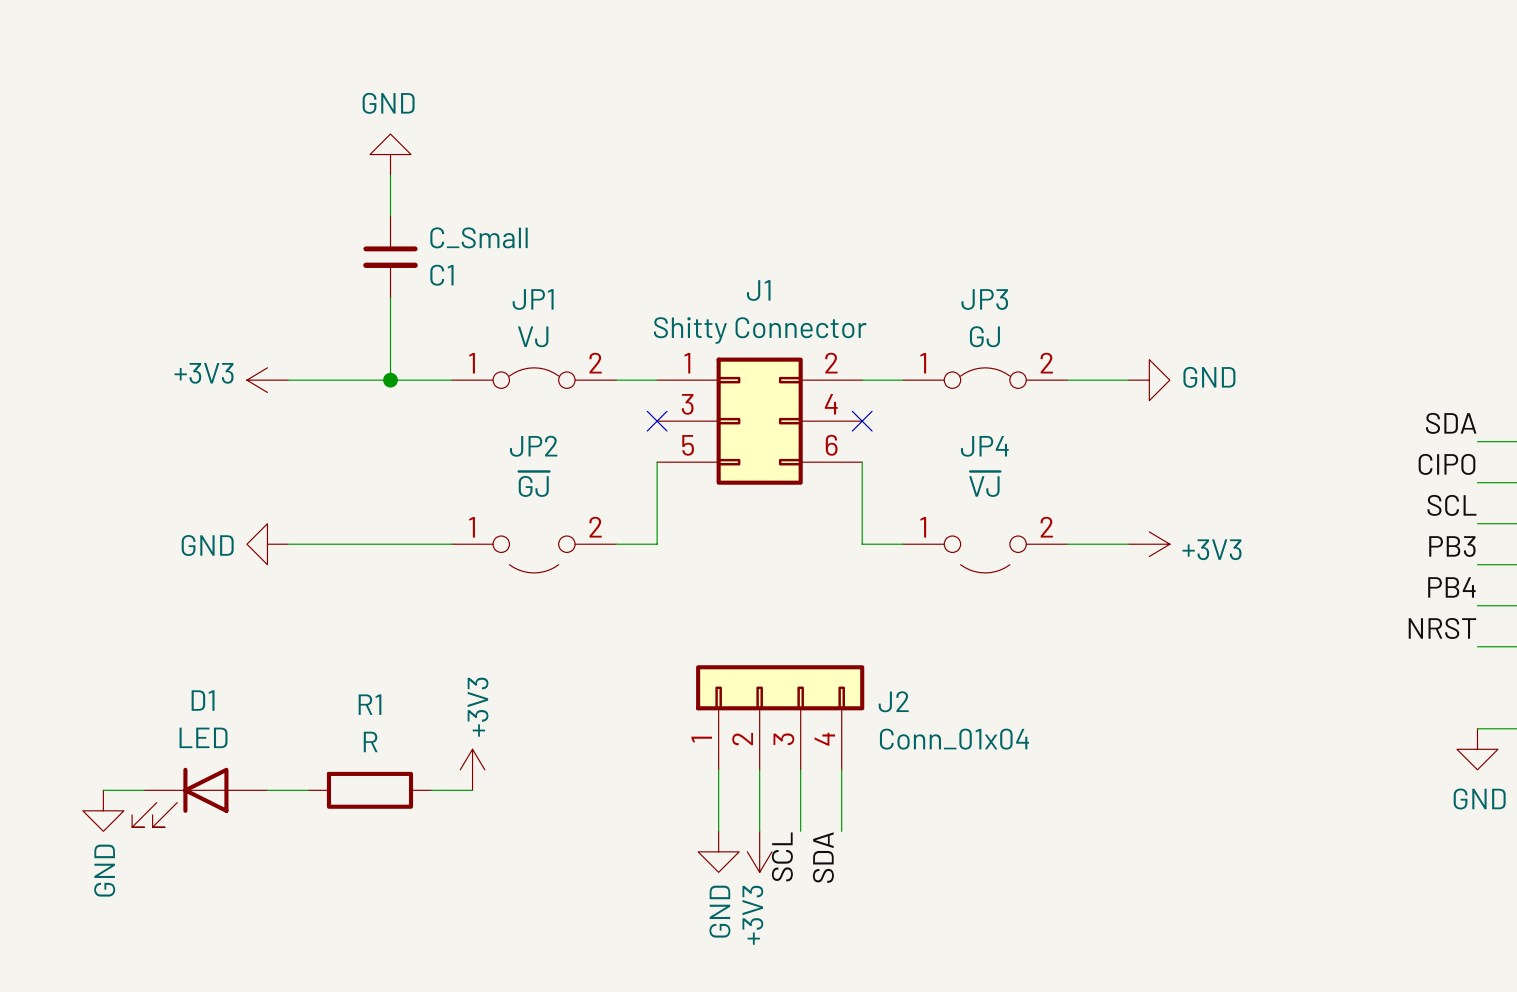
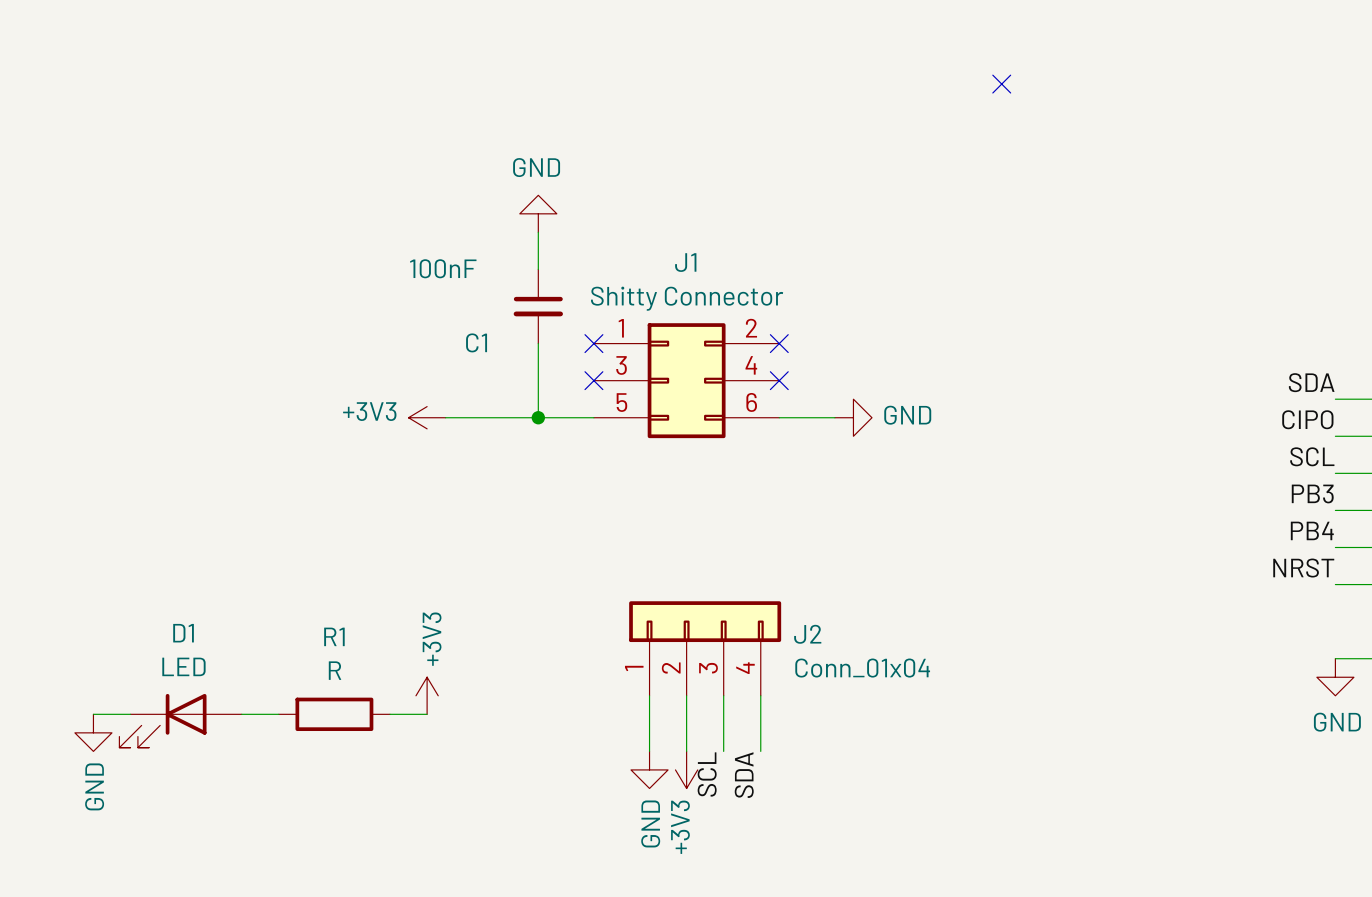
no-connect mark: none -> (1001, 84)
power symbol position: GND (390, 154) -> GND (538, 213)
wire: (390, 175) (390, 216) -> (538, 232) (538, 269)
C1 value: C_Small (479, 237) -> 100nF (443, 268)
C1 position: (390, 257) -> (538, 306)
C1 name position: C1 (441, 275) -> C1 (476, 342)
wire: (390, 298) (390, 380) -> (538, 343) (538, 417)
JP1: VJ (534, 378) -> none
JP3: GJ (985, 378) -> none
power symbol position: +3V3 (267, 380) -> +3V3 (427, 417)
wire: (287, 380) (452, 380) -> none
junction: (390, 380) -> none
wire: (616, 380) (657, 380) -> none
no-connect mark: none -> (593, 343)
wire: (862, 380) (903, 380) -> none
no-connect mark: none -> (779, 343)
wire: (1067, 380) (1128, 380) -> none
power symbol position: GND (1149, 380) -> GND (853, 417)
junction: none -> (538, 417)
wire: (657, 462) (657, 544) (616, 544) -> (593, 417) (445, 417)
wire: (862, 462) (862, 544) (903, 544) -> (779, 417) (834, 417)
power symbol: GND (267, 544) -> none
wire: (287, 544) (452, 544) -> none
wire: (1067, 544) (1128, 544) -> none
power symbol: +3V3 (1149, 544) -> none
JP2: ~{GJ} (534, 554) -> none
JP4: ~{VJ} (985, 554) -> none

